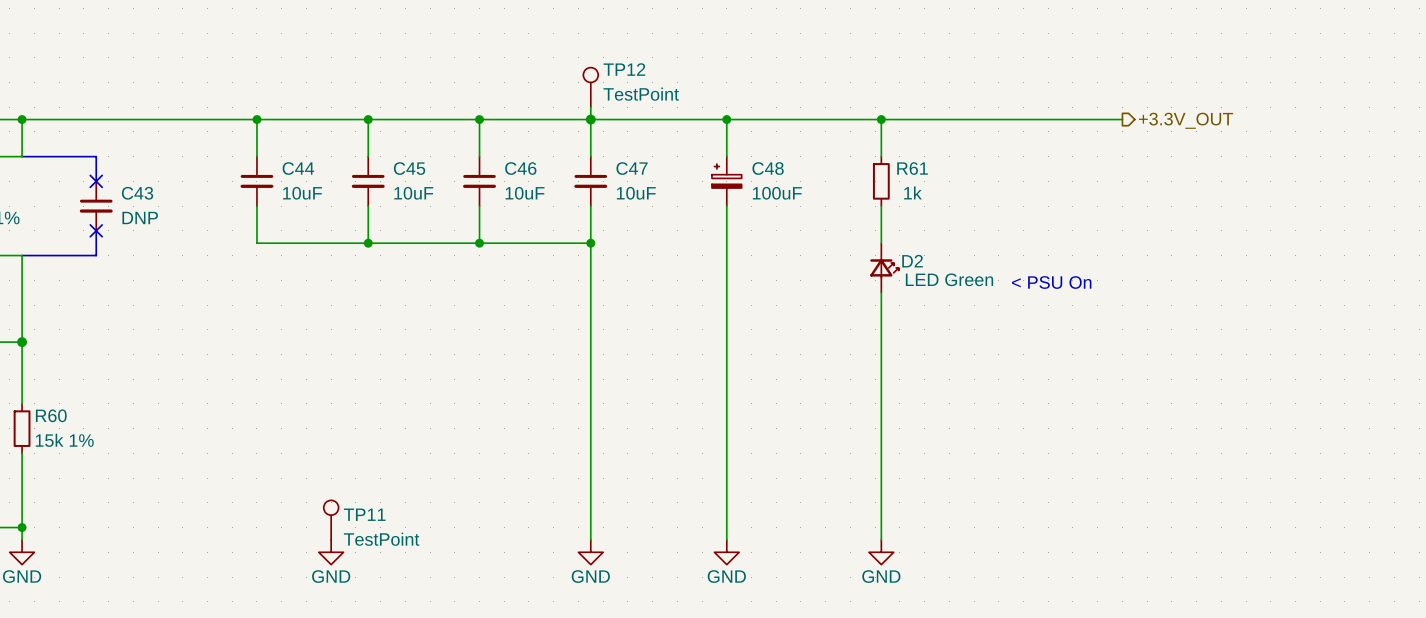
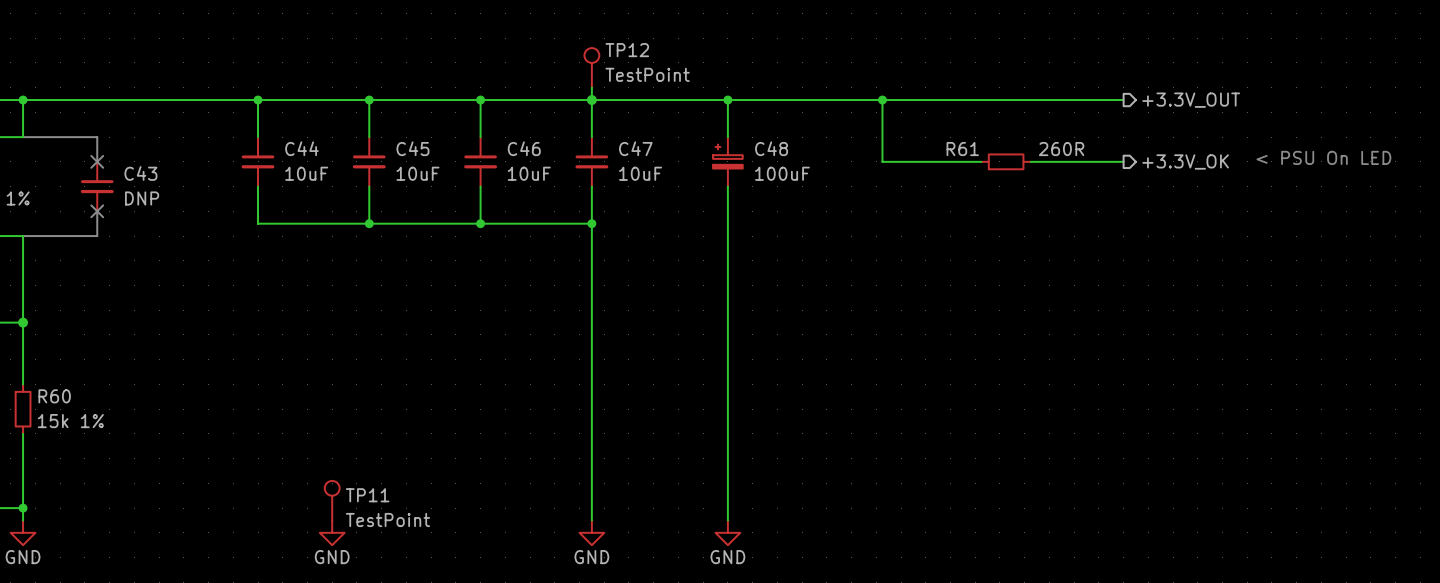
wire: none -> (882, 137) (882, 161) (981, 161)
R61 name position: R61 (912, 168) -> R61 (962, 149)
text: none -> < PSU On LED (1323, 157)
R61 rotation: 0° (881, 181) -> 90° clockwise (1006, 161)
R61 position: (881, 181) -> (1006, 161)
wire: none -> (1030, 161) (1123, 161)
hierarchical label: none -> +3.3V_OK (1185, 161)
R61 value: 1k (912, 192) -> 260R (1061, 149)
wire: (881, 206) (881, 243) -> none
D2: LED Green (884, 267) -> none
text: < PSU On (1051, 282) -> none
wire: (881, 292) (881, 539) -> none
power symbol: GND (881, 552) -> none

